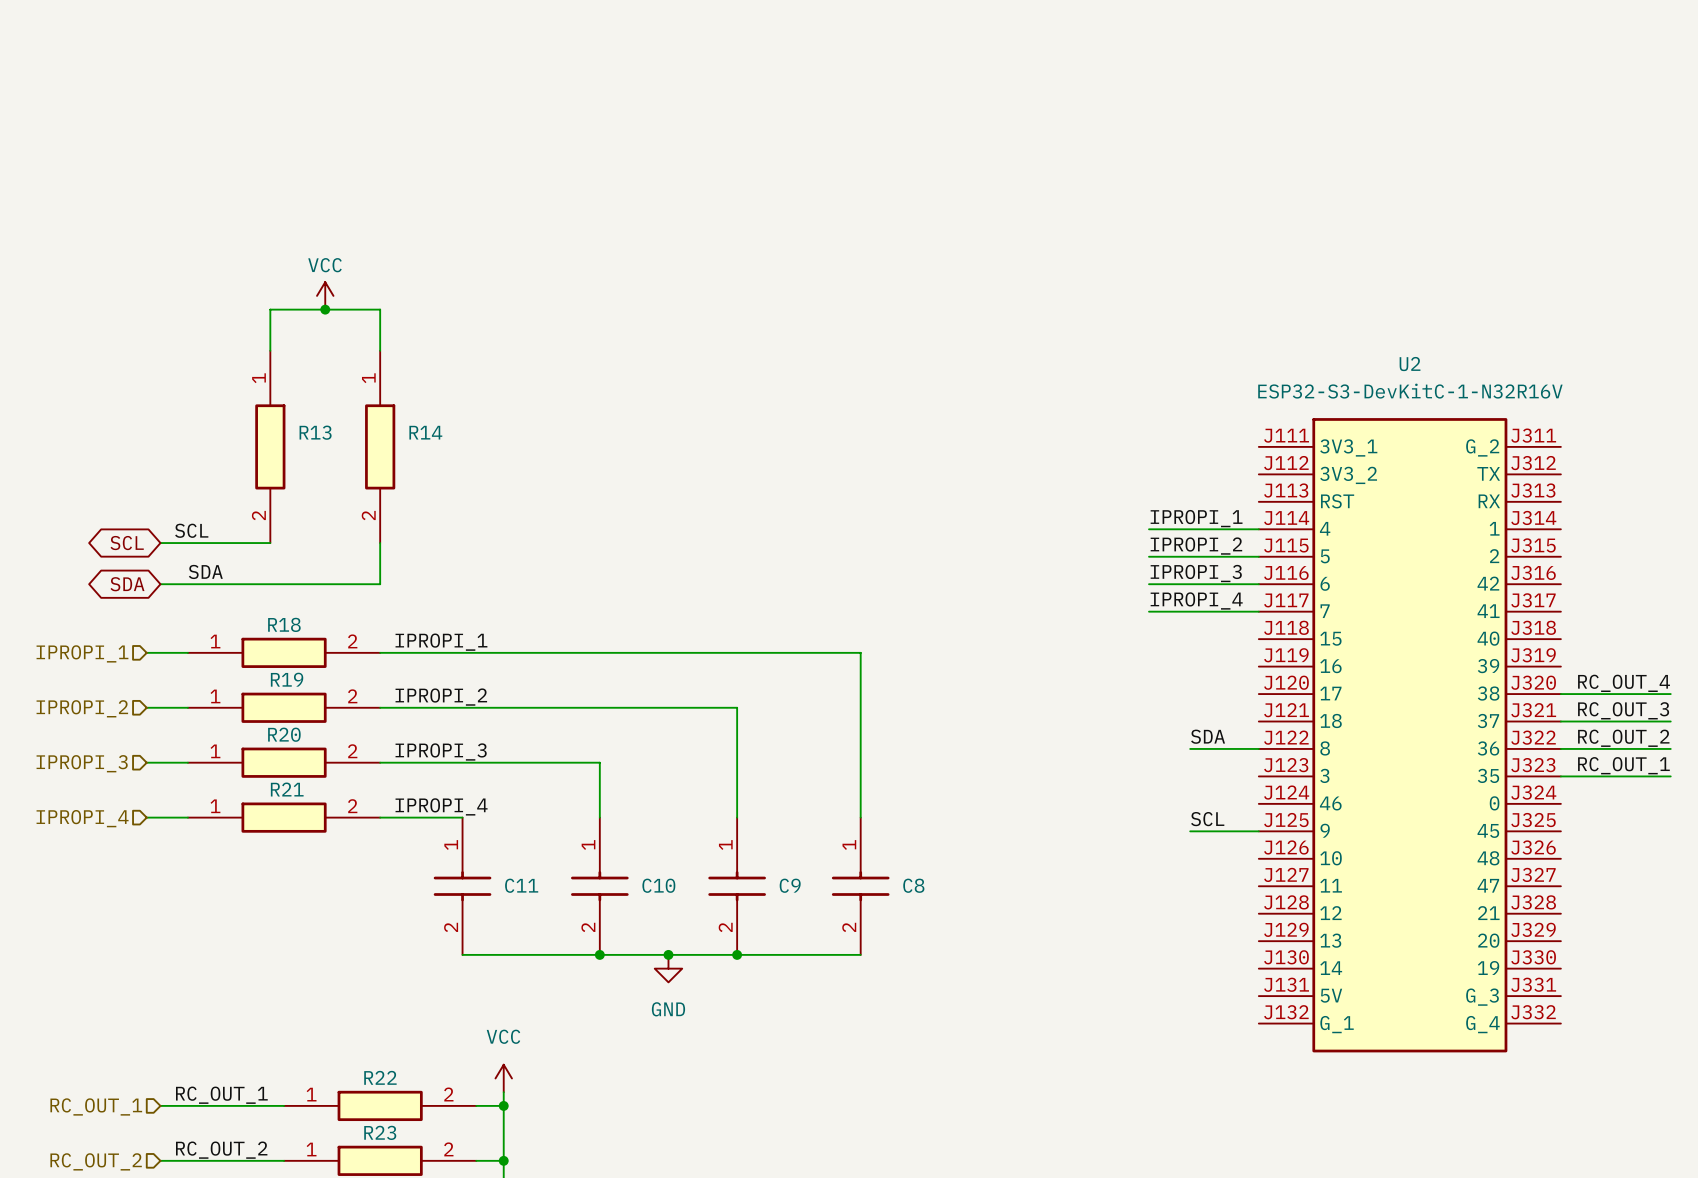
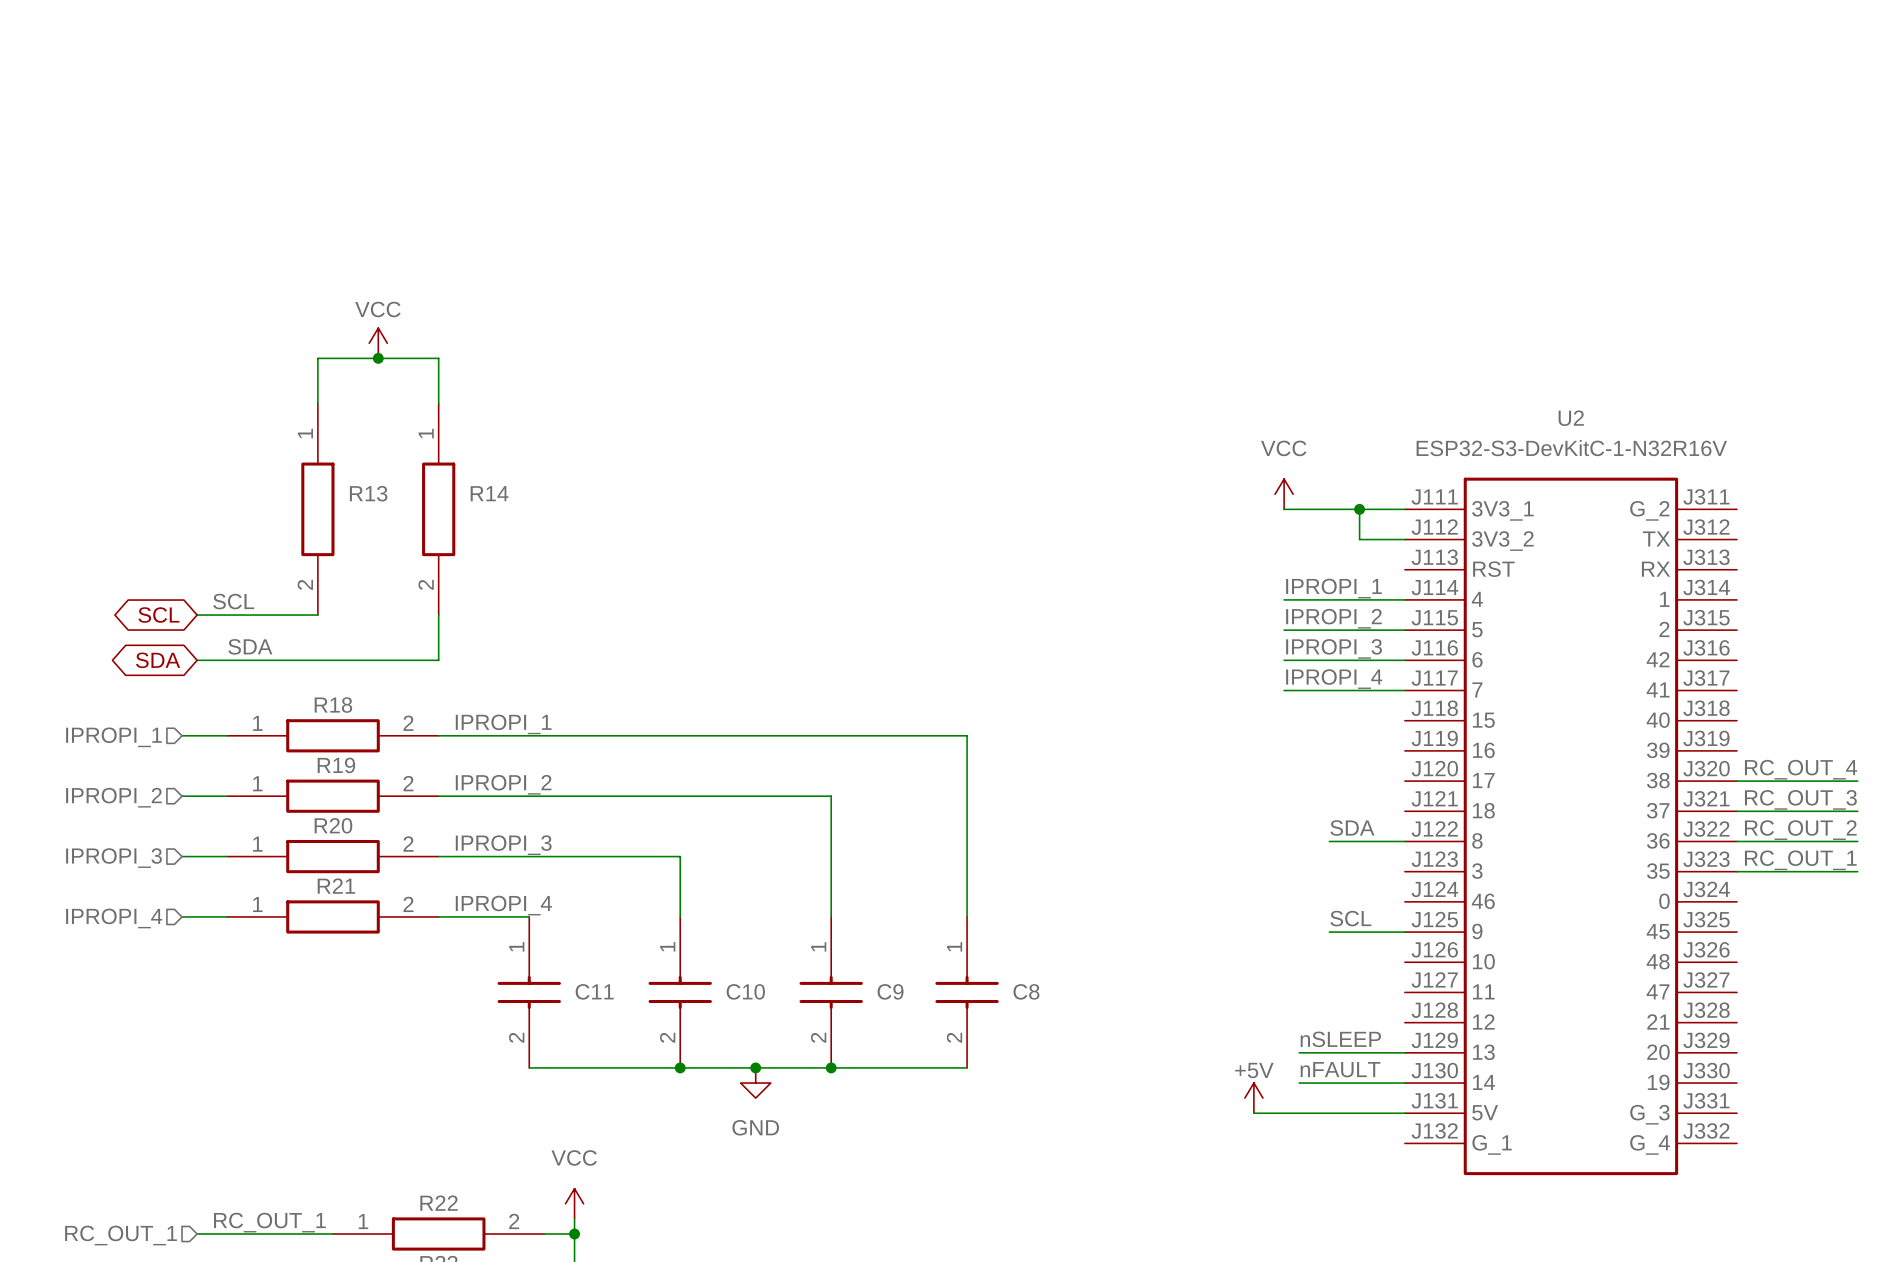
power symbol: none -> VCC (1284, 494)
wire: none -> (1284, 509) (1404, 509)
wire: none -> (1359, 509) (1359, 539) (1404, 539)
junction: none -> (1359, 509)
label: none -> nSLEEP (1340, 1039)
wire: none -> (1299, 1052) (1404, 1052)
label: none -> nFAULT (1340, 1069)
wire: none -> (1299, 1083) (1404, 1083)
power symbol: none -> +5V (1253, 1098)
wire: none -> (1253, 1113) (1404, 1113)

